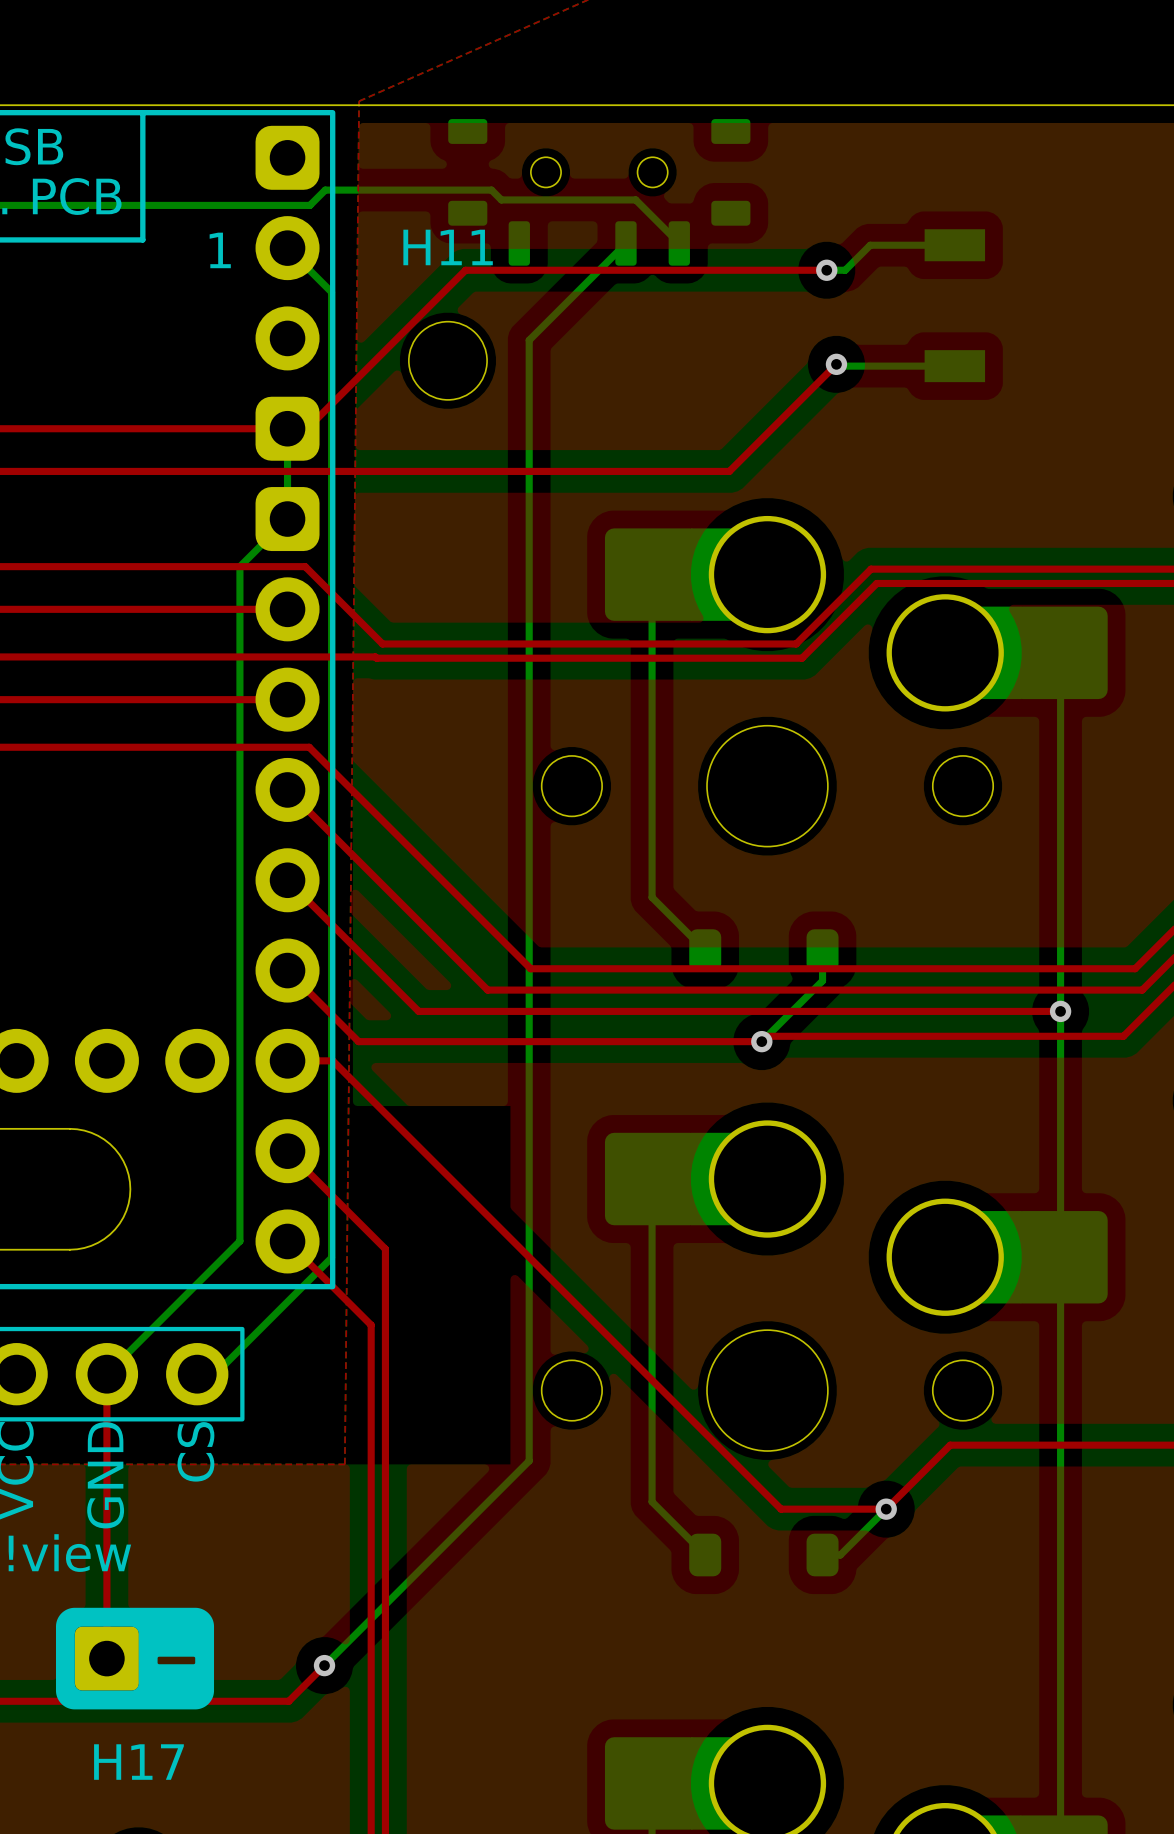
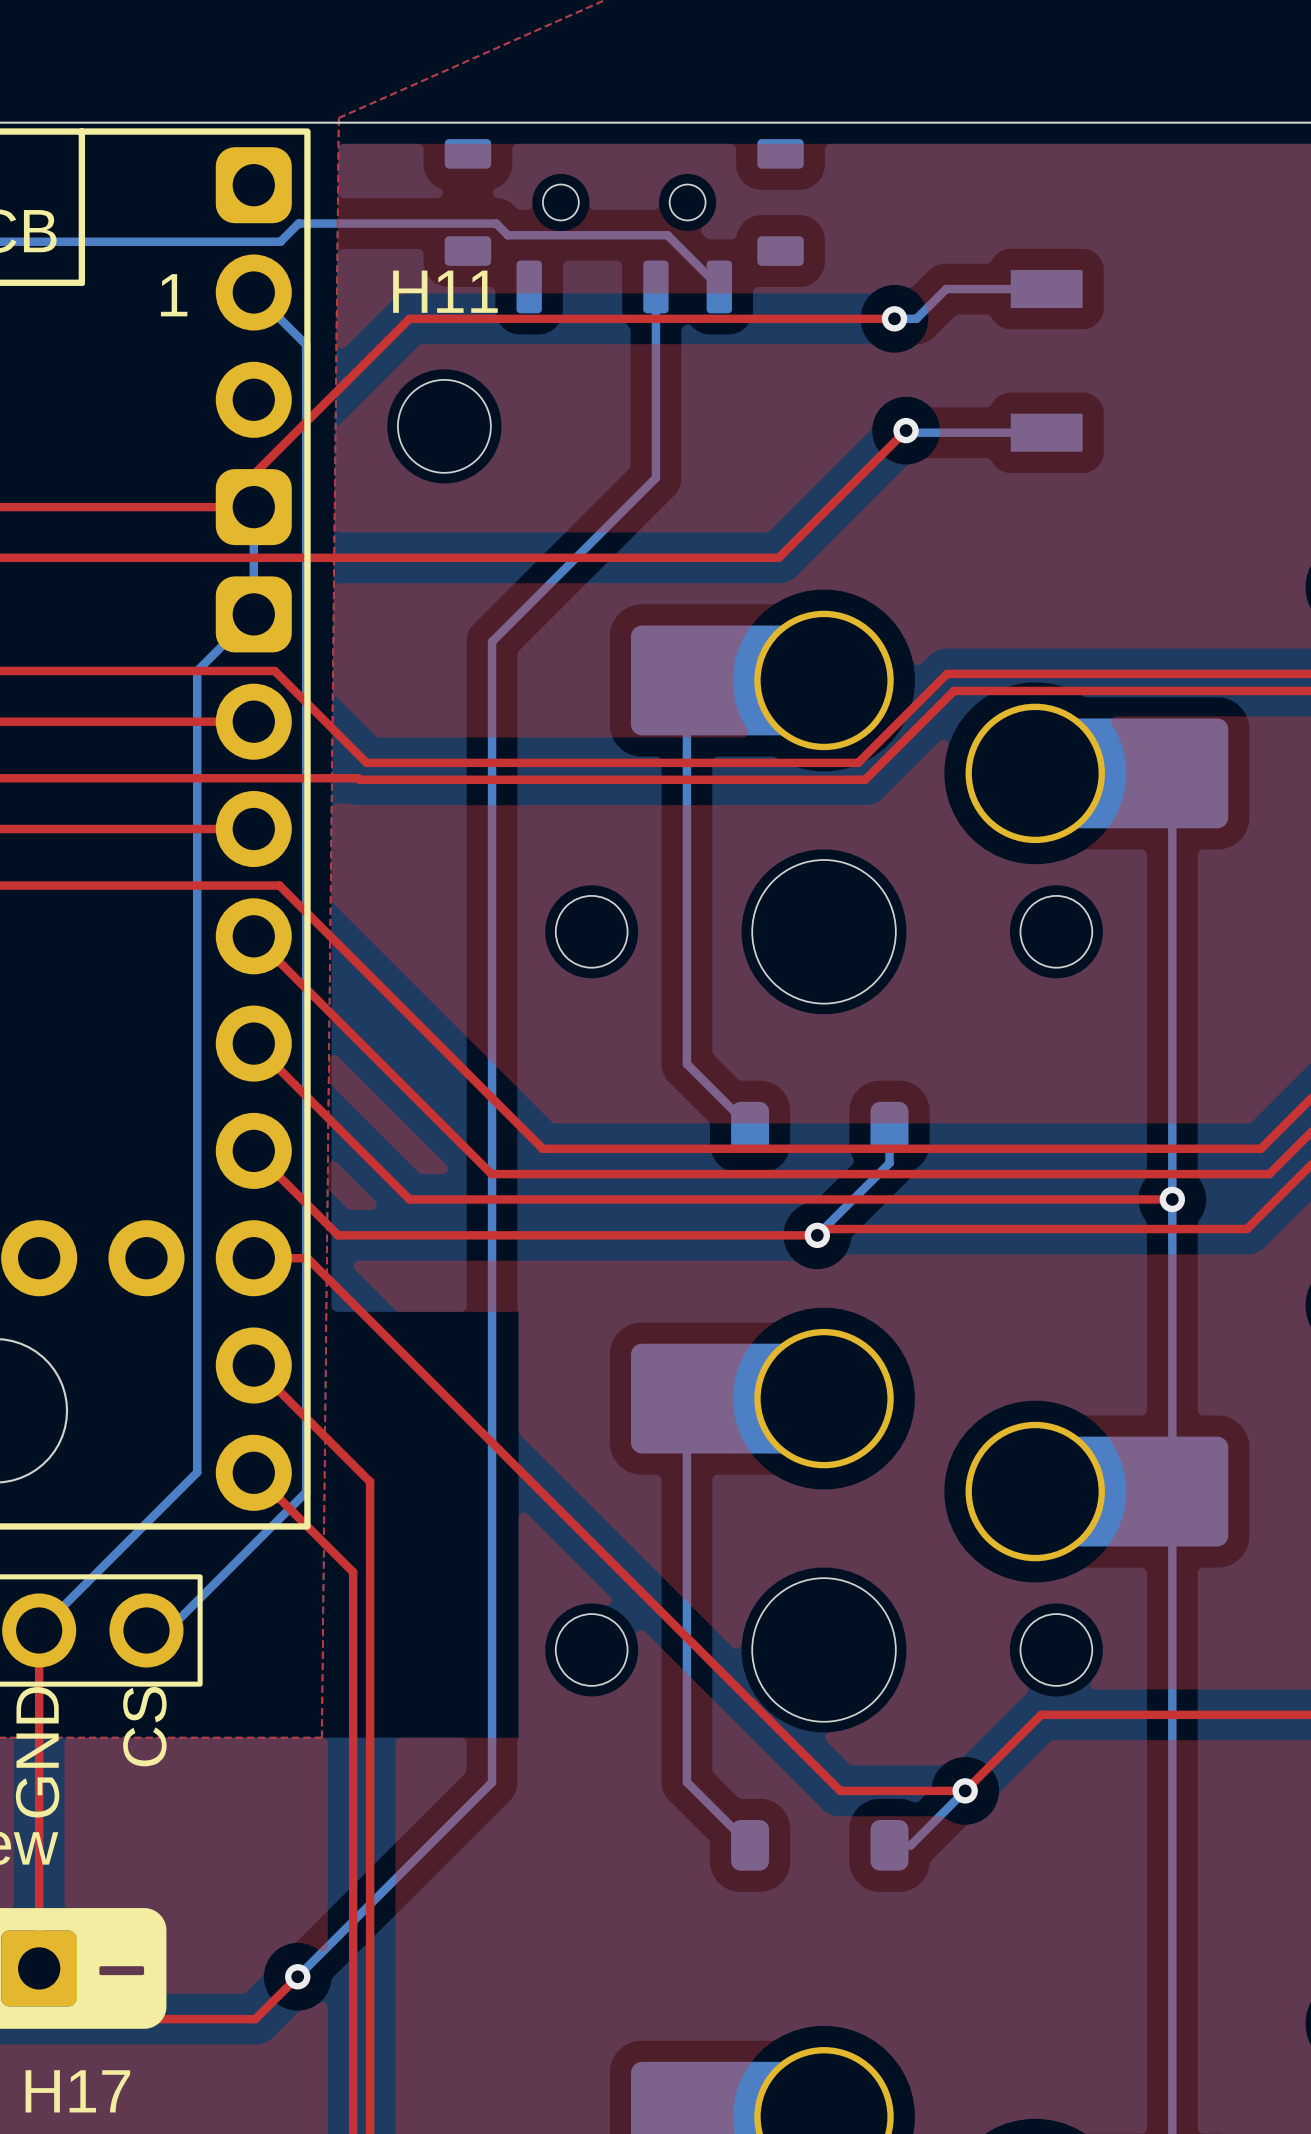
bottom track: (625, 243) (529, 340) (529, 1460) (488, 1502) -> (655, 286) (655, 477) (492, 641) (492, 1782)
top track: (465, 270) (307, 428) (287, 428) -> (465, 318) (409, 318) (253, 474) (253, 507)

